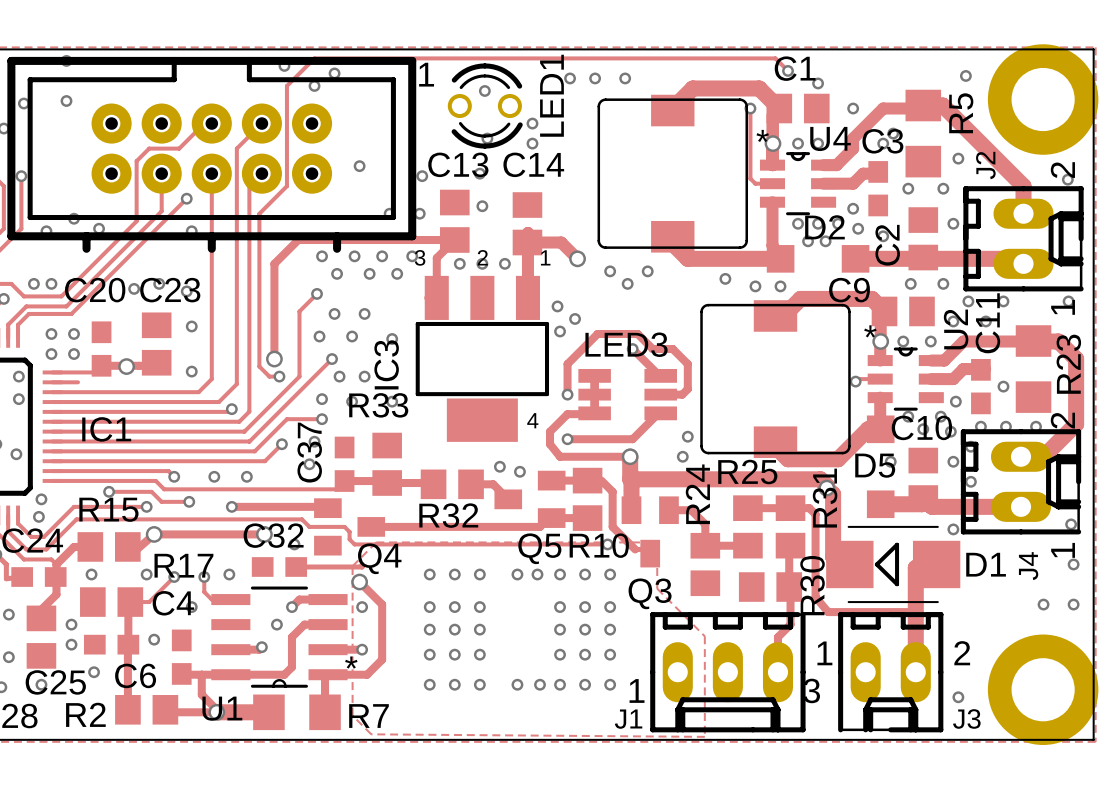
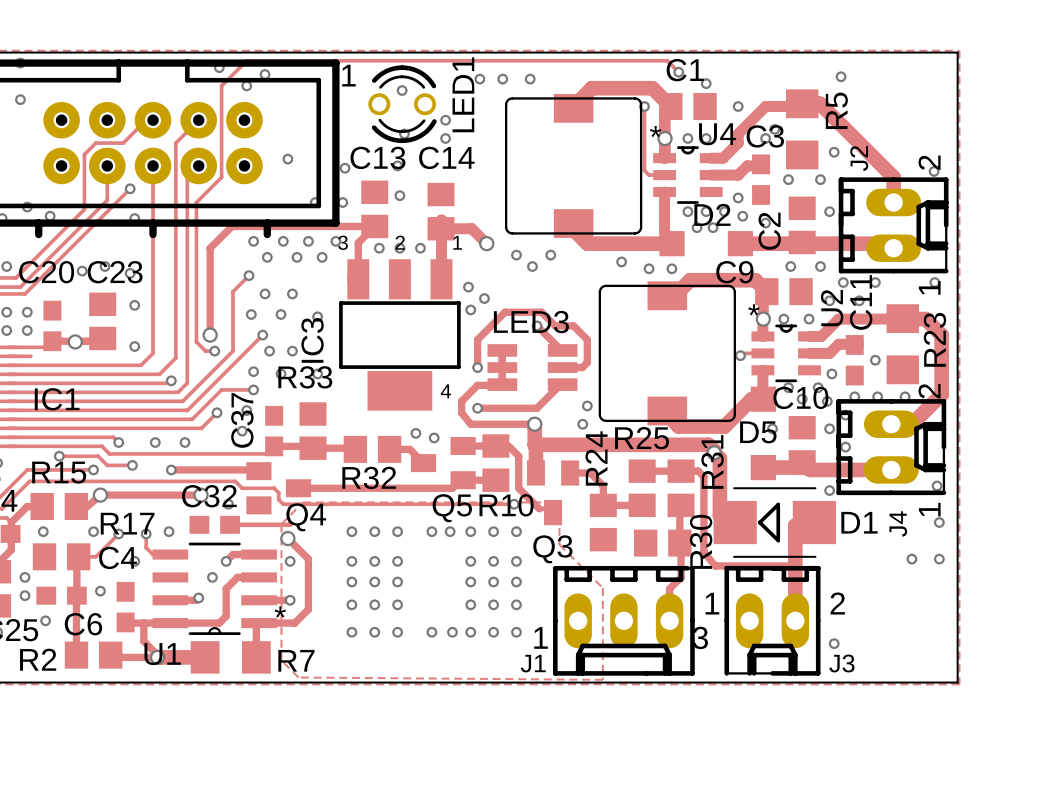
part: (1043, 99) -> none
part: (1043, 689) -> none

